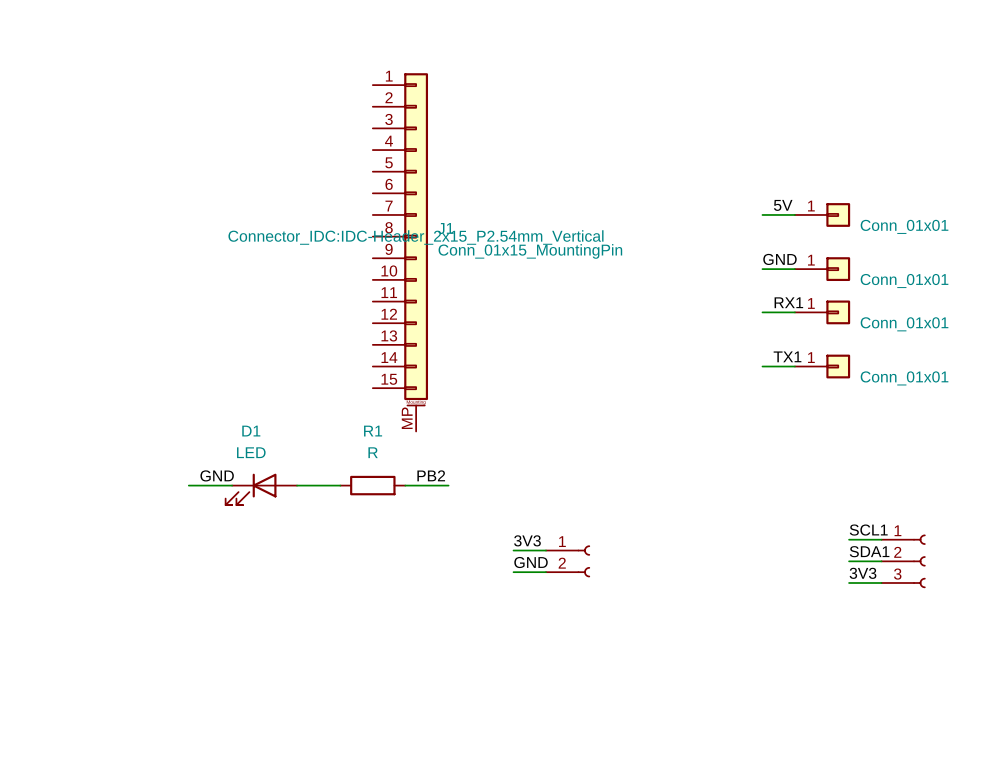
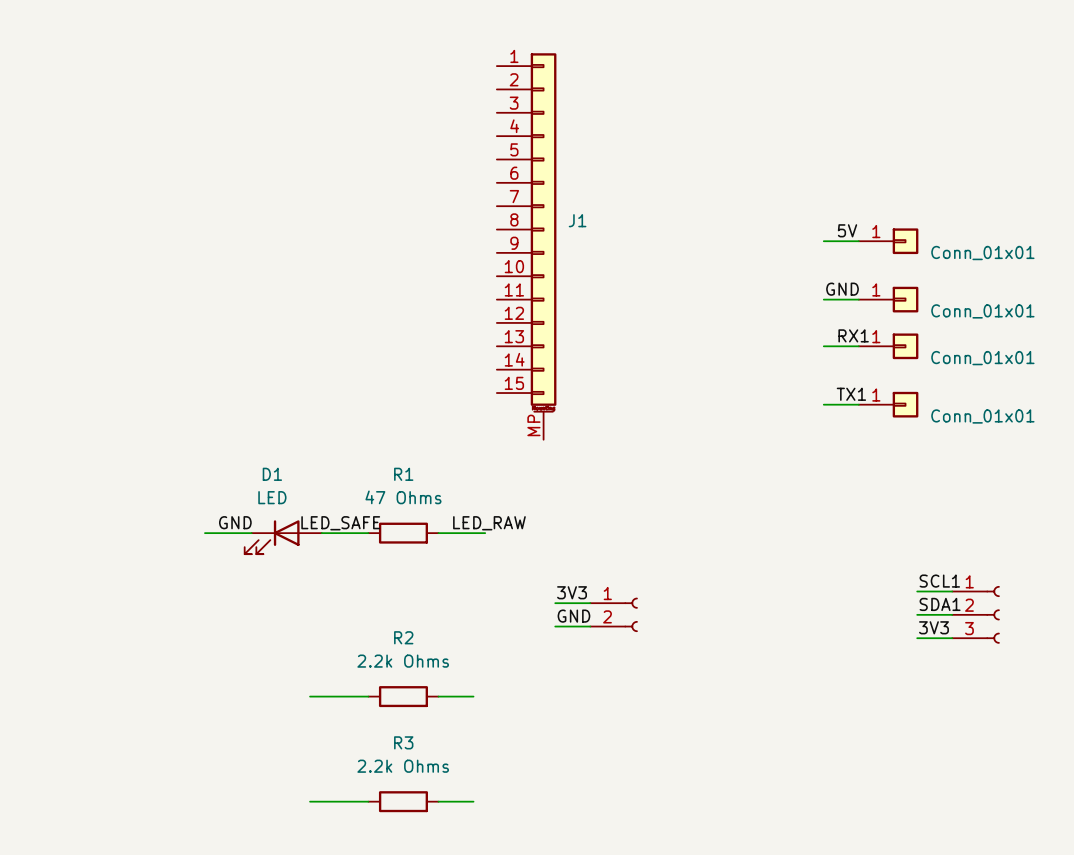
J1 text: Connector_IDC:IDC-Header_2x15_P2.54mm_Vertical (415, 237) -> none
J1 value: Conn_01x15_MountingPin (530, 251) -> none
J1 position: (400, 252) -> (526, 246)
R1 value: R (373, 452) -> 47 Ohms (403, 497)
label: PB2 (431, 475) -> LED_RAW (489, 523)
label: none -> LED_SAFE (340, 523)
wire: none -> (310, 696) (368, 696)
R2: none -> 2.2k Ohms (403, 696)
wire: none -> (438, 696) (473, 696)
wire: none -> (310, 801) (368, 801)
R3: none -> 2.2k Ohms (403, 801)
wire: none -> (438, 801) (473, 801)

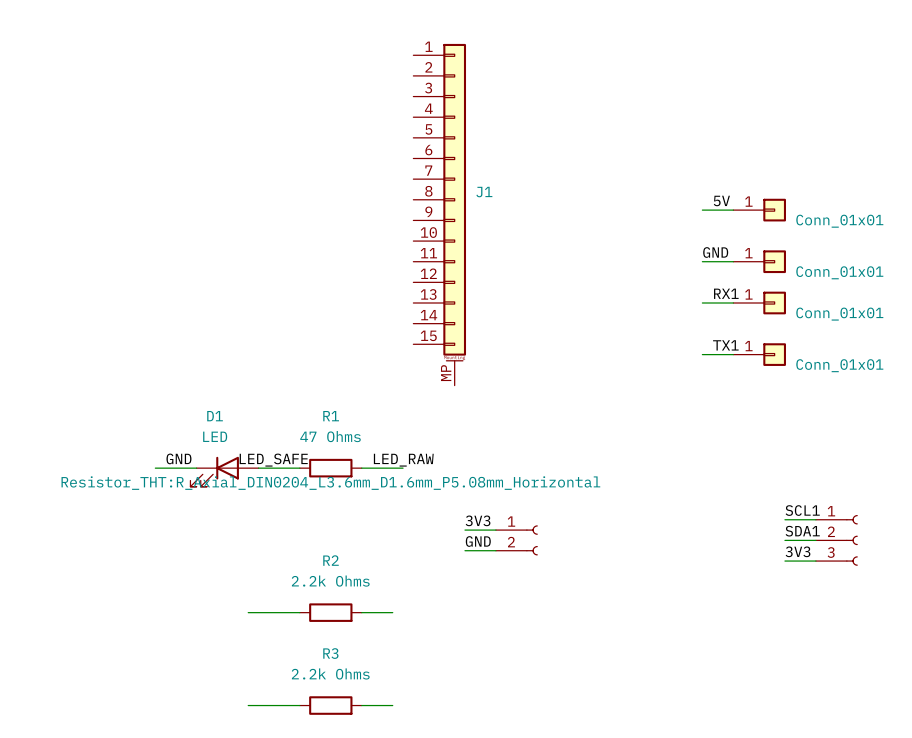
R1 text: none -> Resistor_THT:R_Axial_DIN0204_L3.6mm_D1.6mm_P5.08mm_Horizontal (330, 483)

